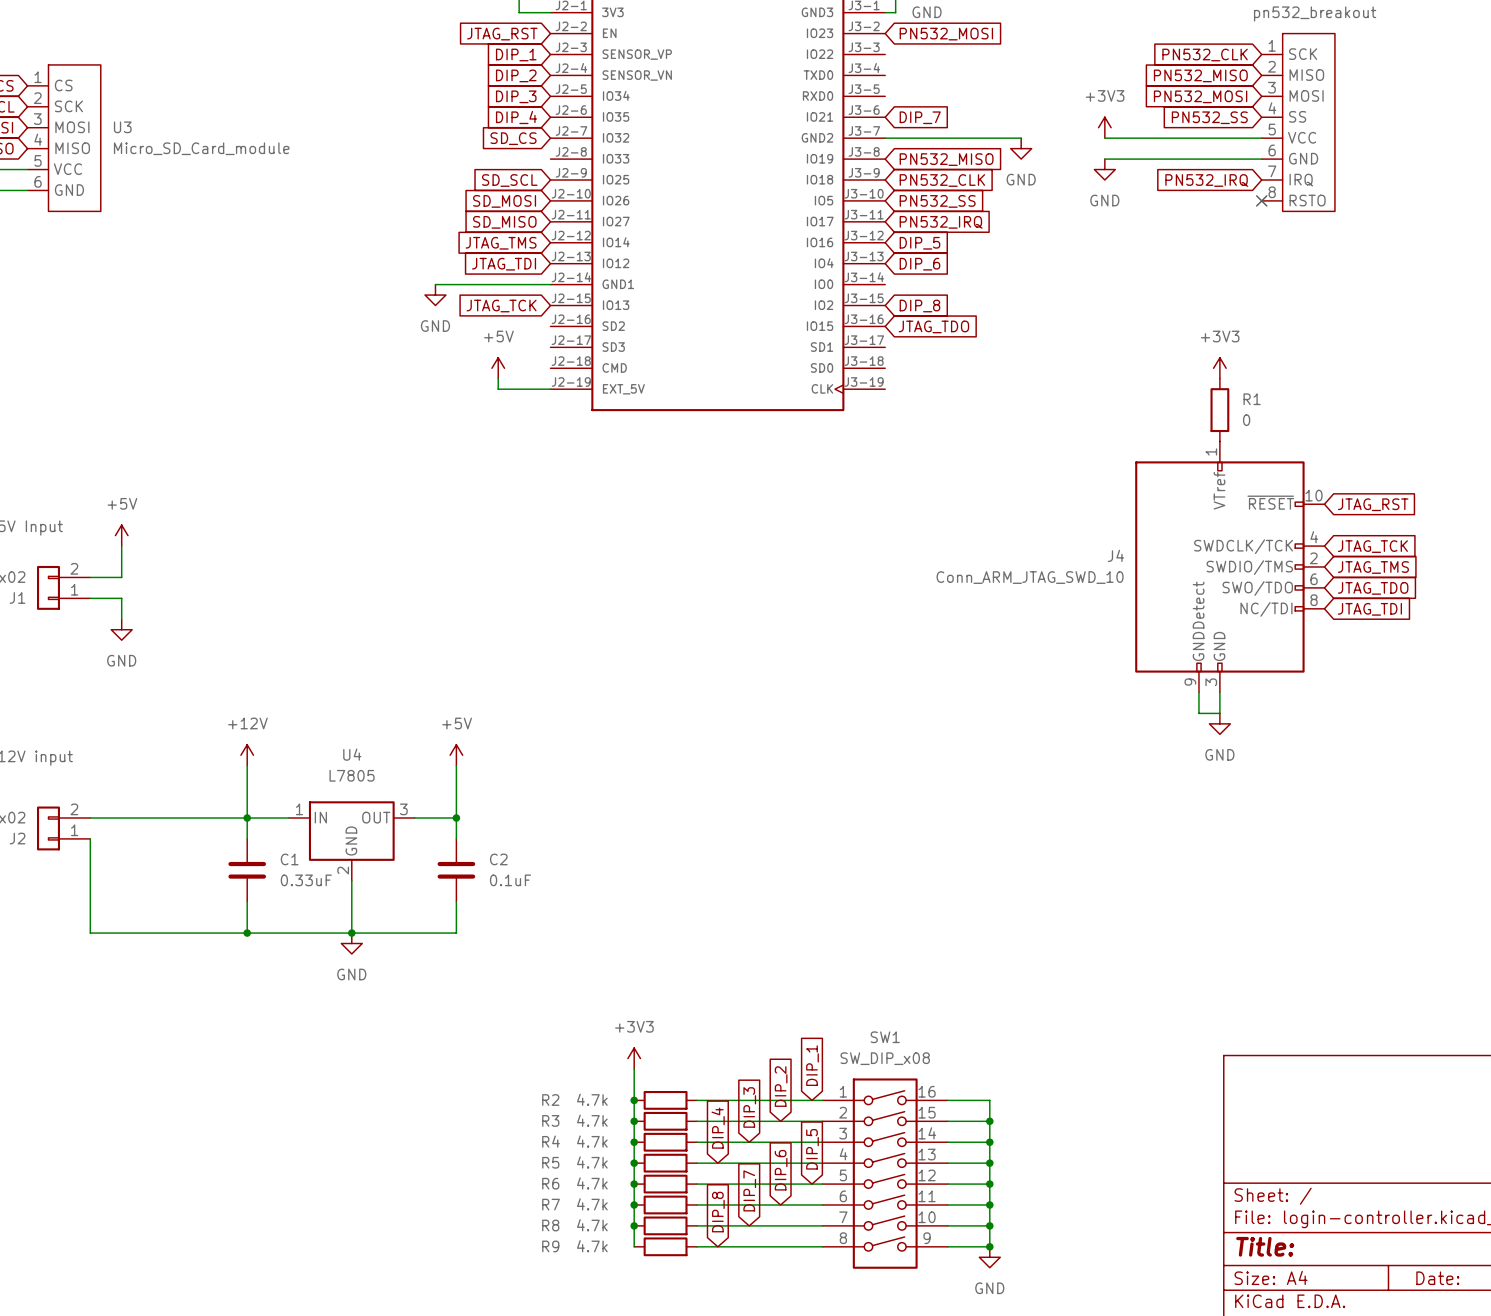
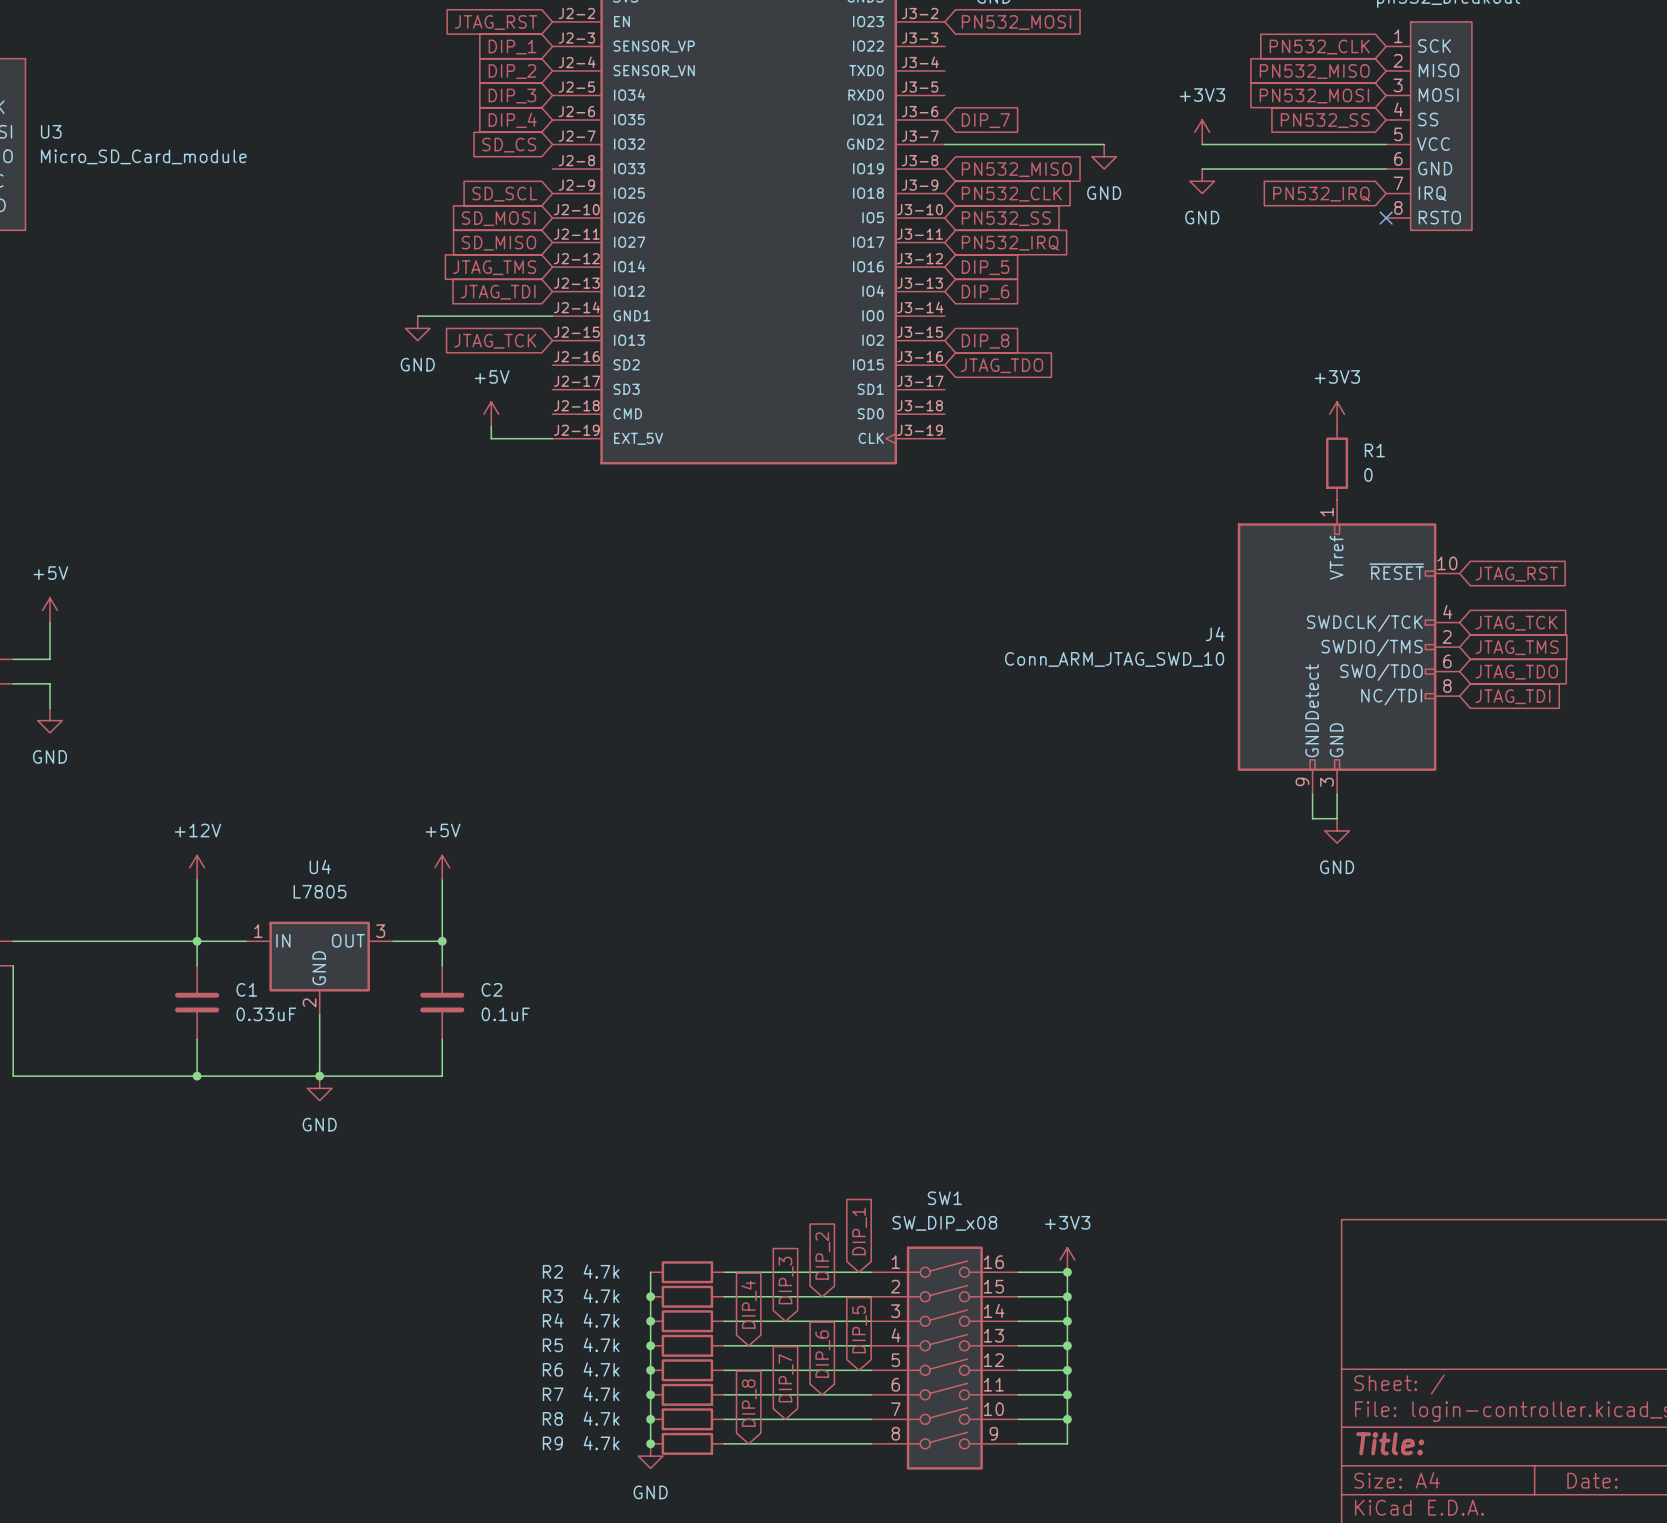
power symbol: +3V3 (634, 1058) -> none
wire: (634, 1069) (634, 1100) -> none
power symbol: none -> +3V3 (1067, 1259)
junction: (634, 1100) -> none
junction: none -> (1067, 1272)
junction: none -> (650, 1443)
junction: (989, 1246) -> none
power symbol: none -> GND (650, 1456)
power symbol: GND (989, 1257) -> none

